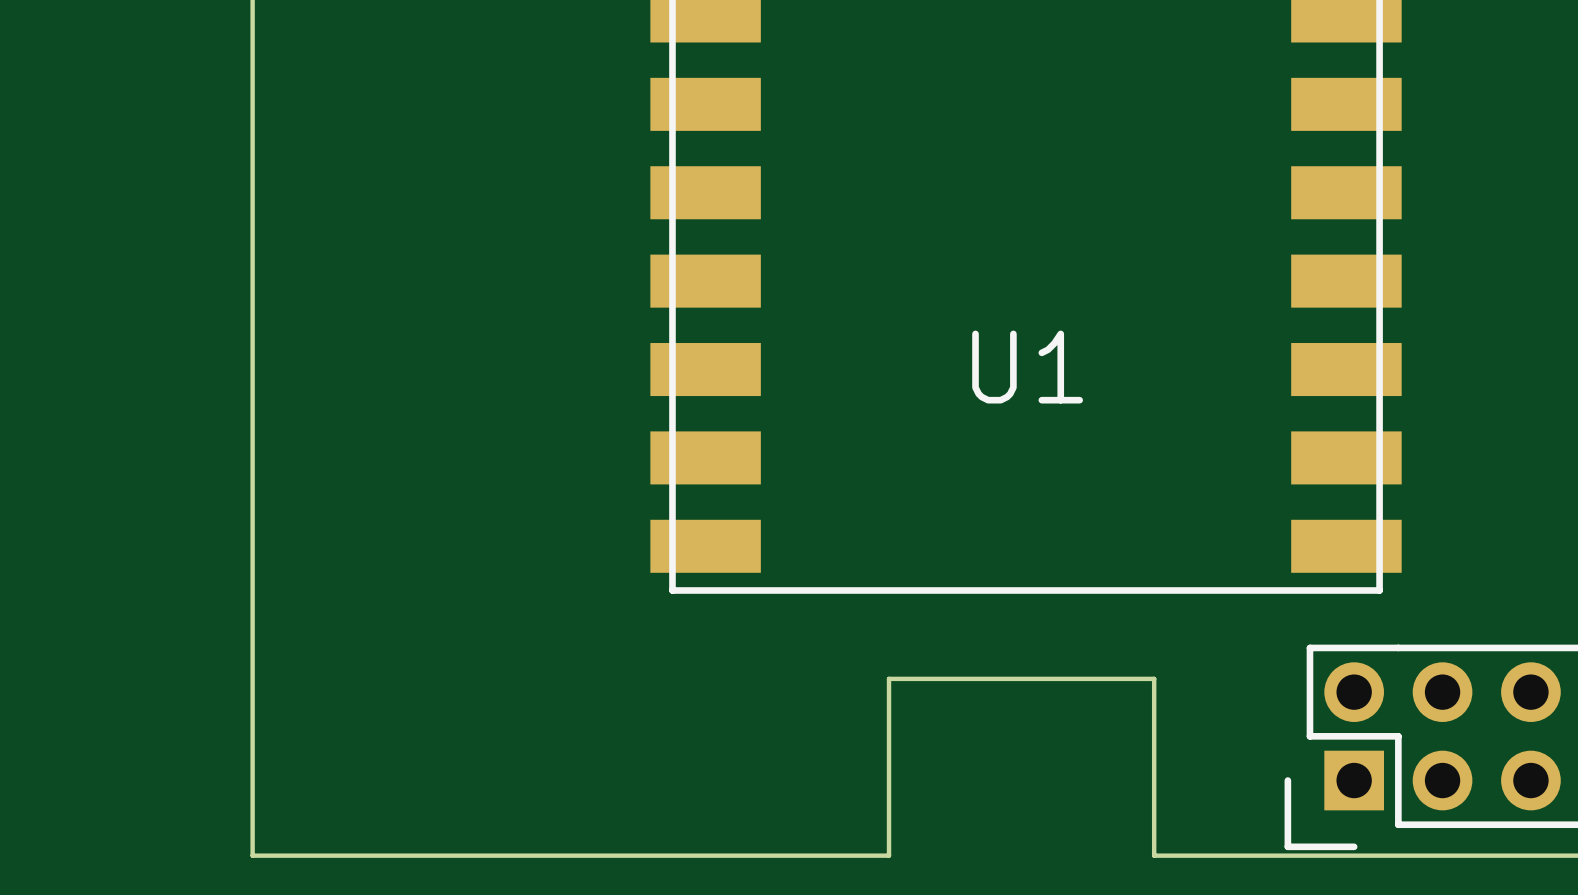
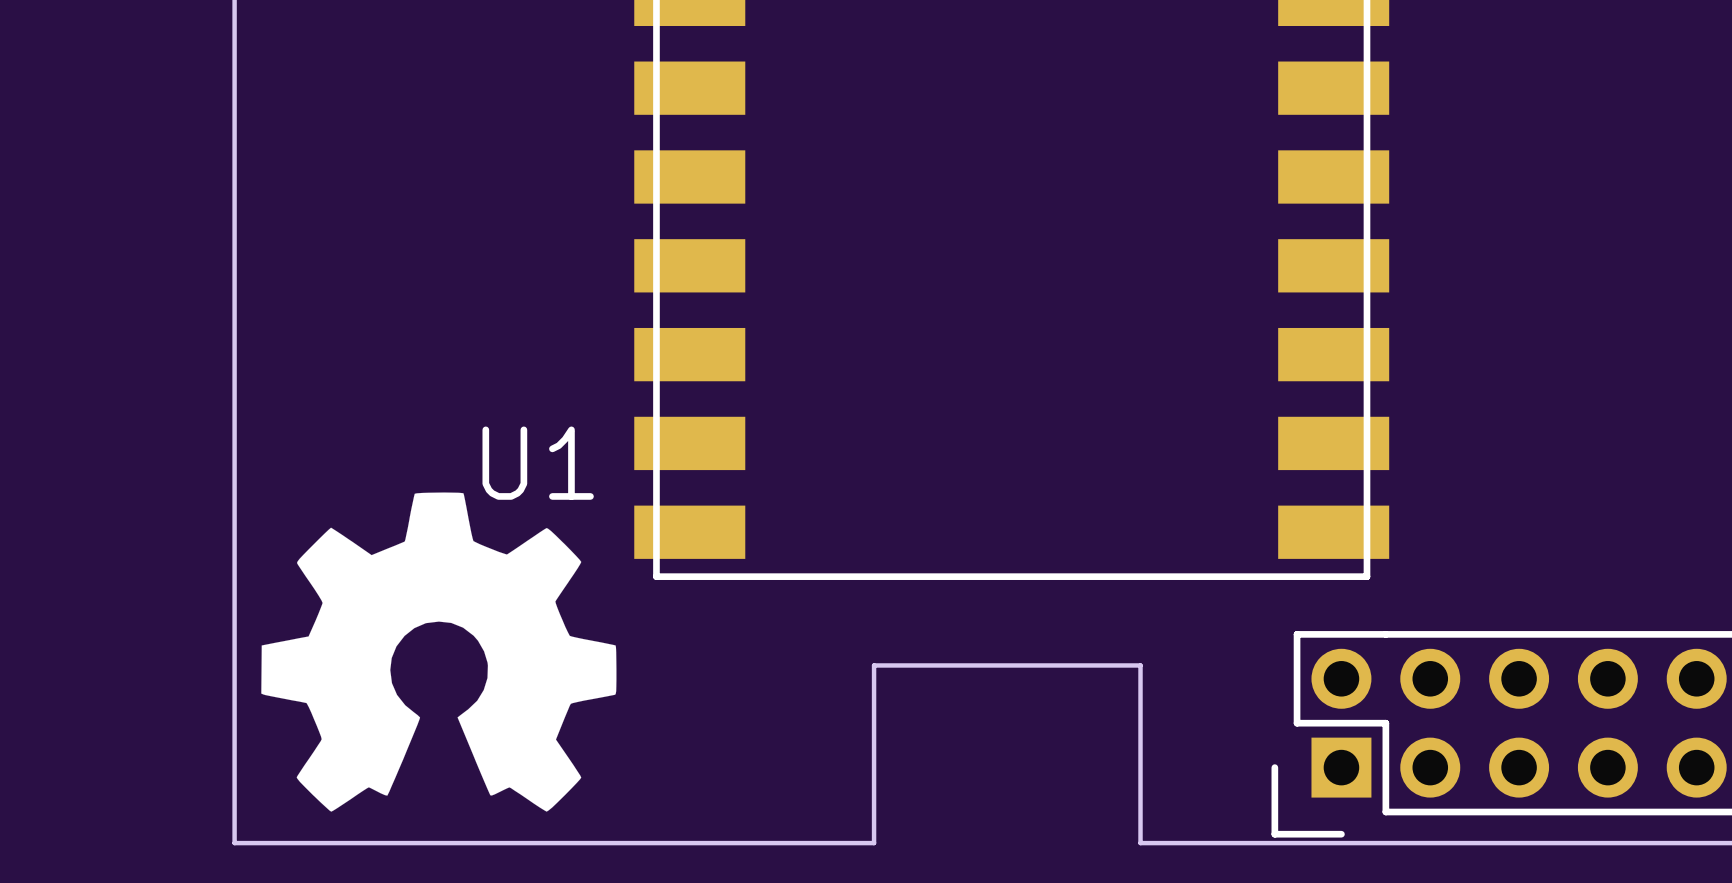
U1 name position: U1 (1027, 367) -> U1 (538, 463)
drawing: none -> [261, 492, 617, 812]

